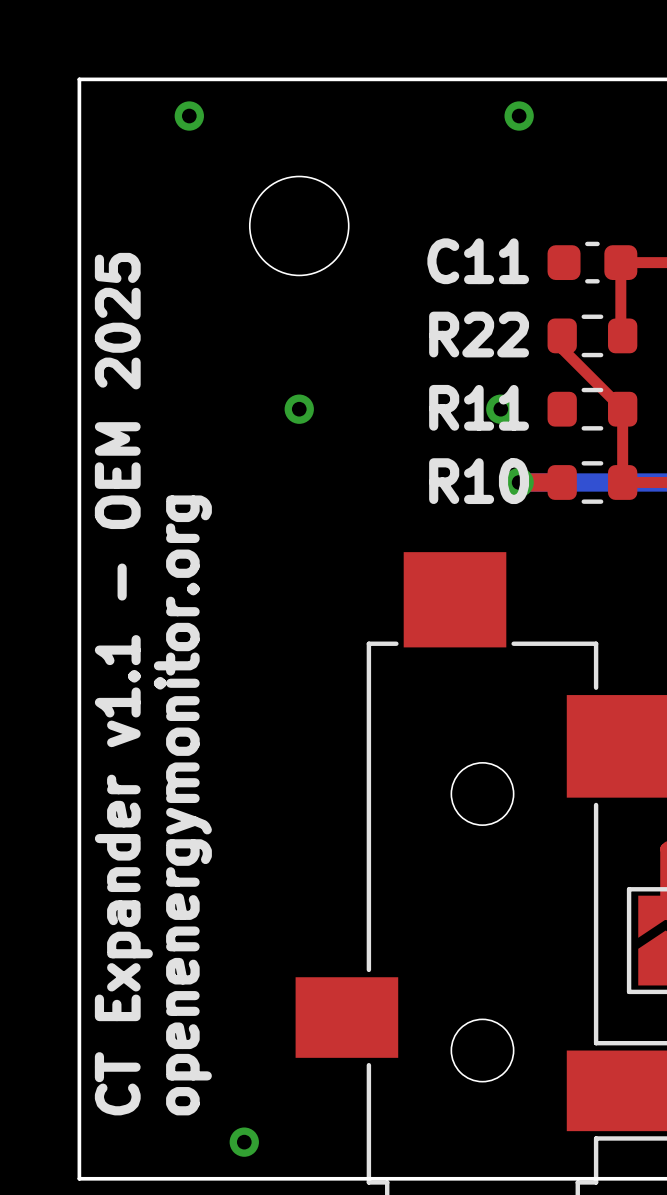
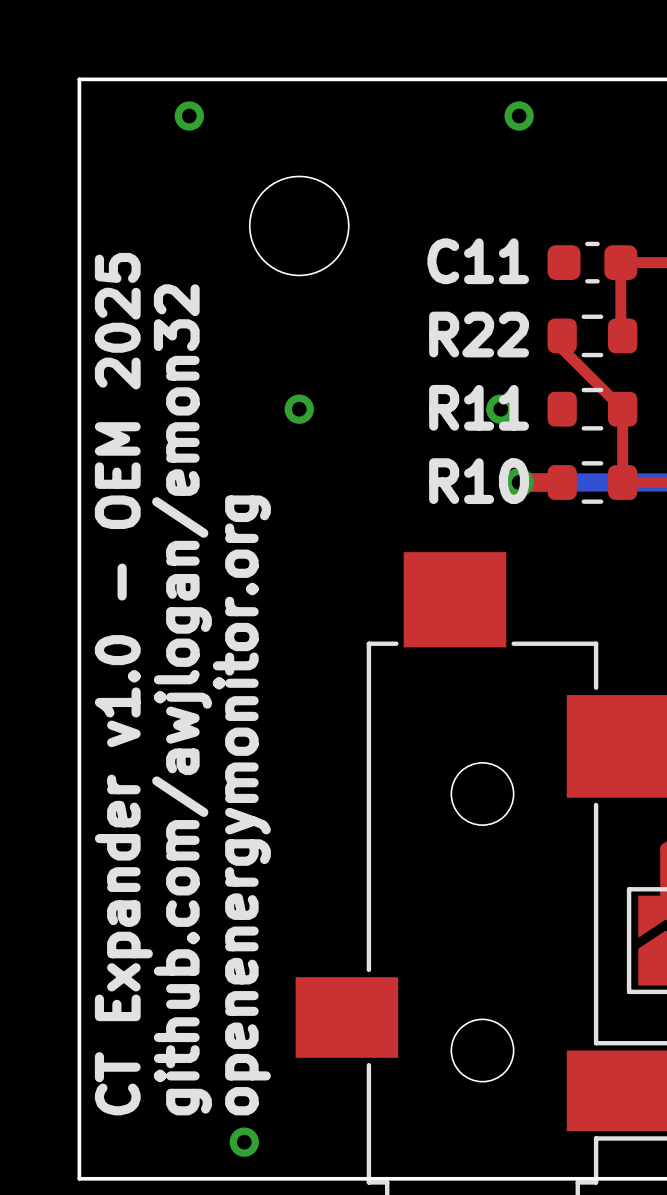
text: CT Expander v1.1 - OEM 2025 (123, 684) -> CT Expander v1.0 - OEM 2025 (123, 684)
text: openenergymonitor.org (182, 805) -> github.com/awjlogan/emon32 (182, 699)
text: none -> openenergymonitor.org (241, 805)

